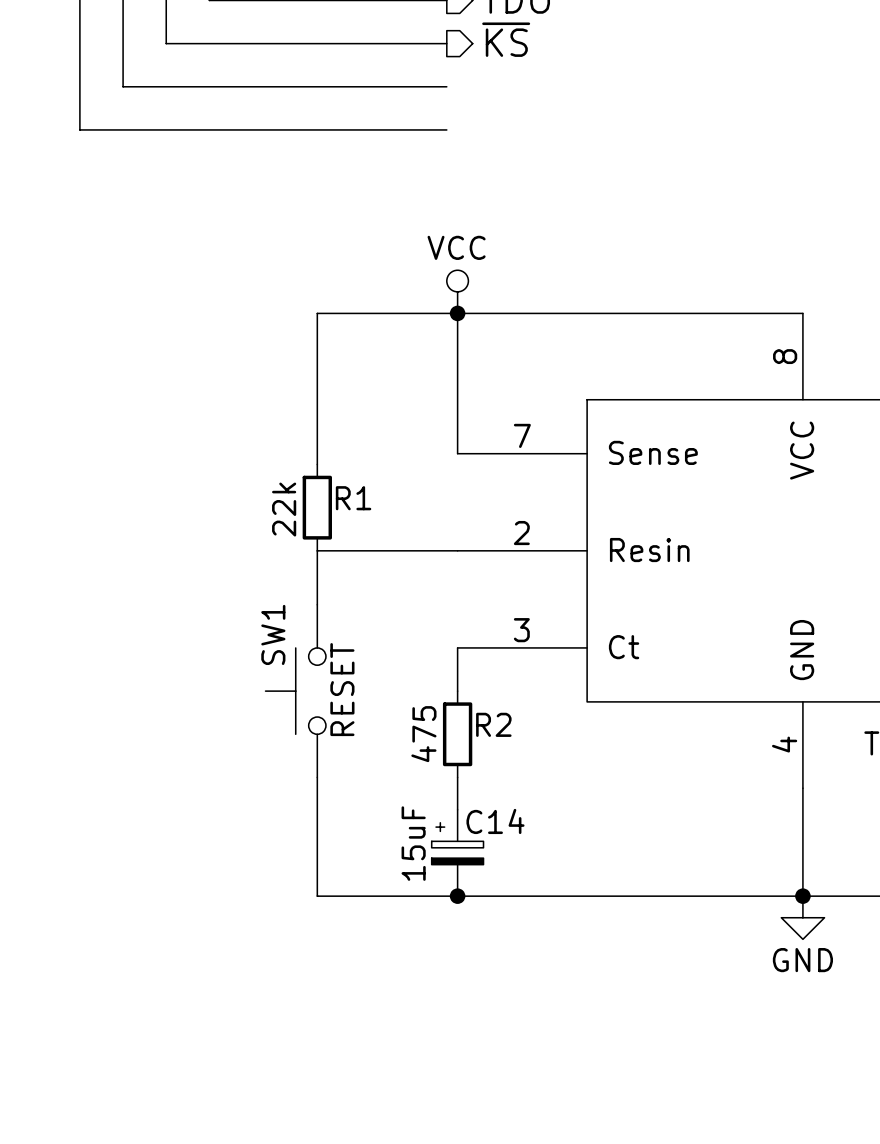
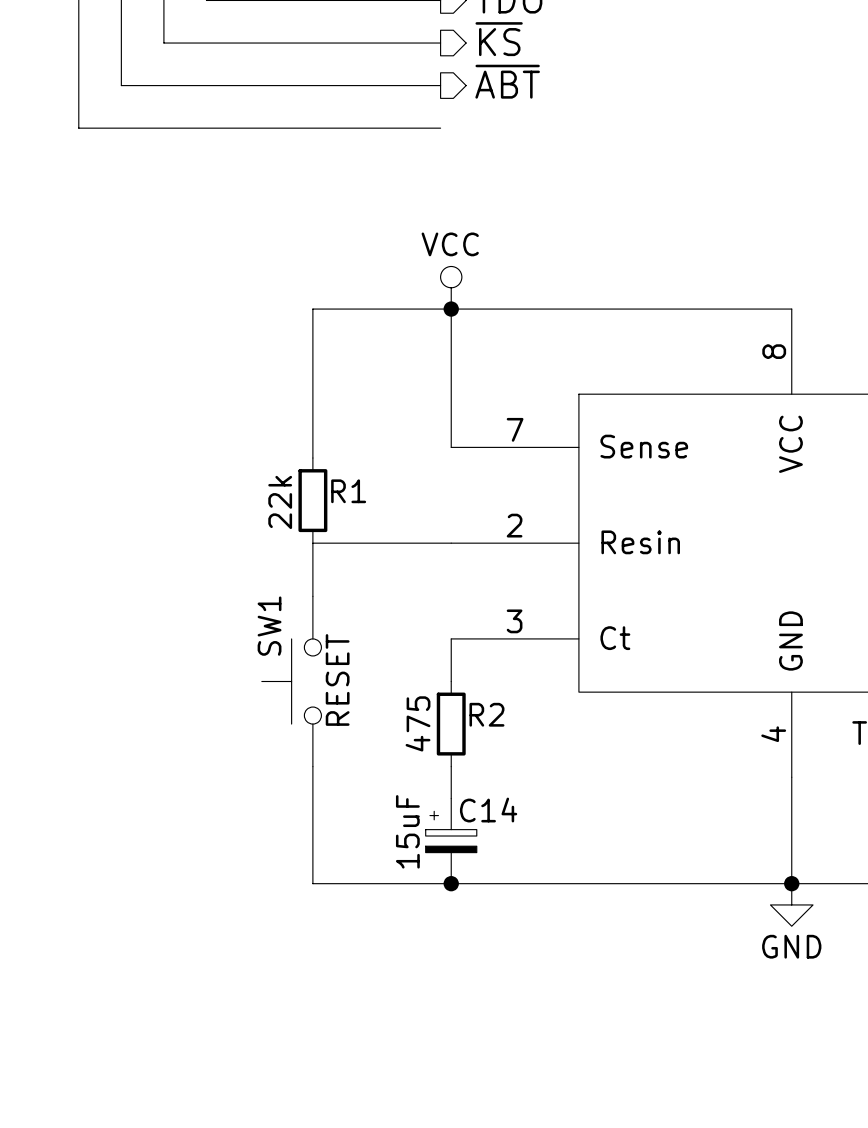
hierarchical label: none -> ~{ABT} (507, 81)

